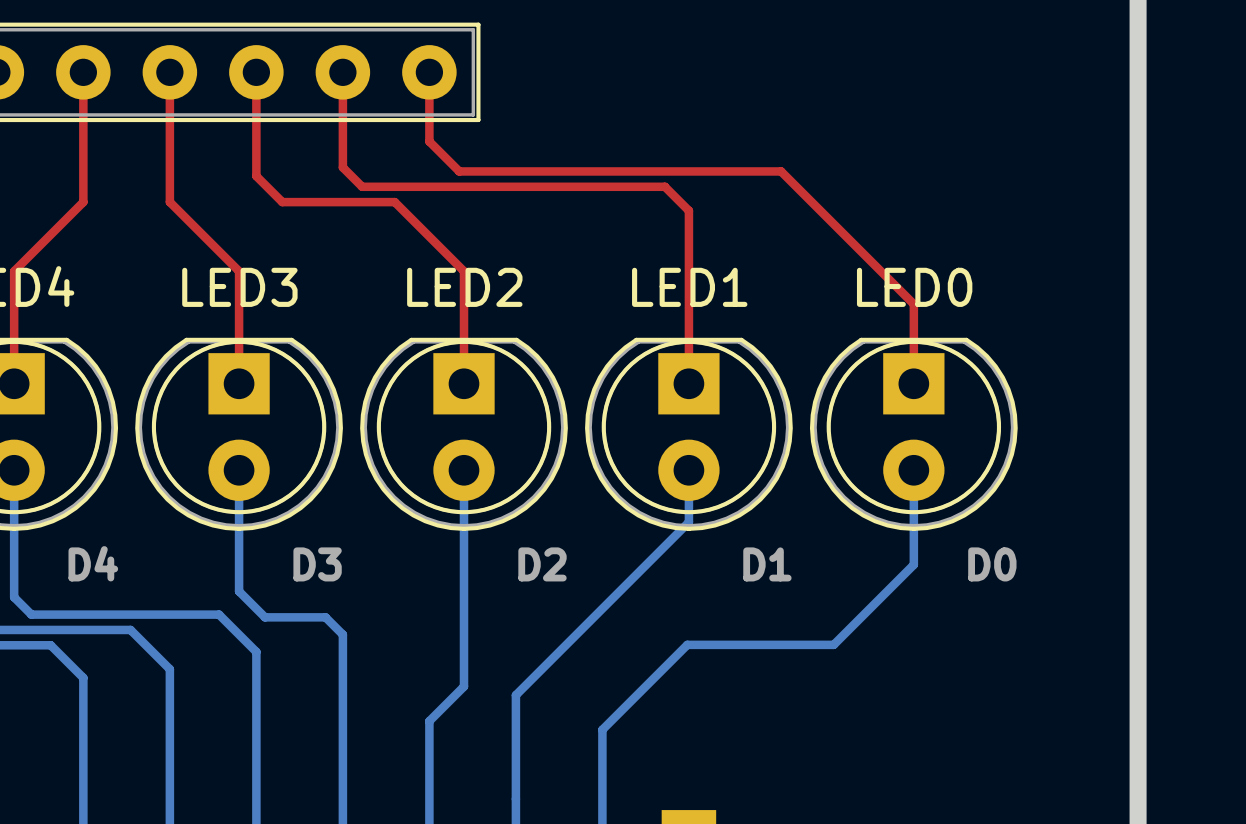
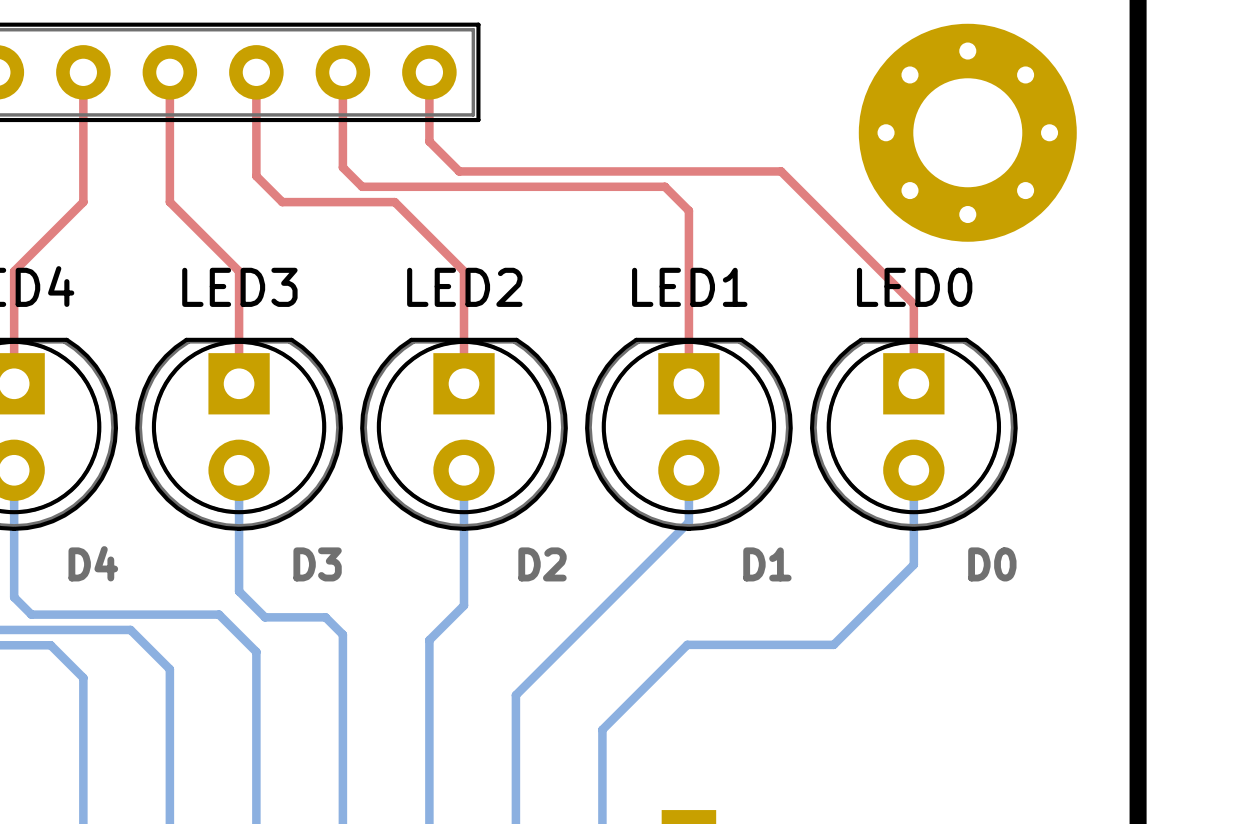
part: none -> (967, 132)
bottom track: (464, 605) (464, 686) (429, 721) -> (464, 605) (429, 640) (429, 721)

